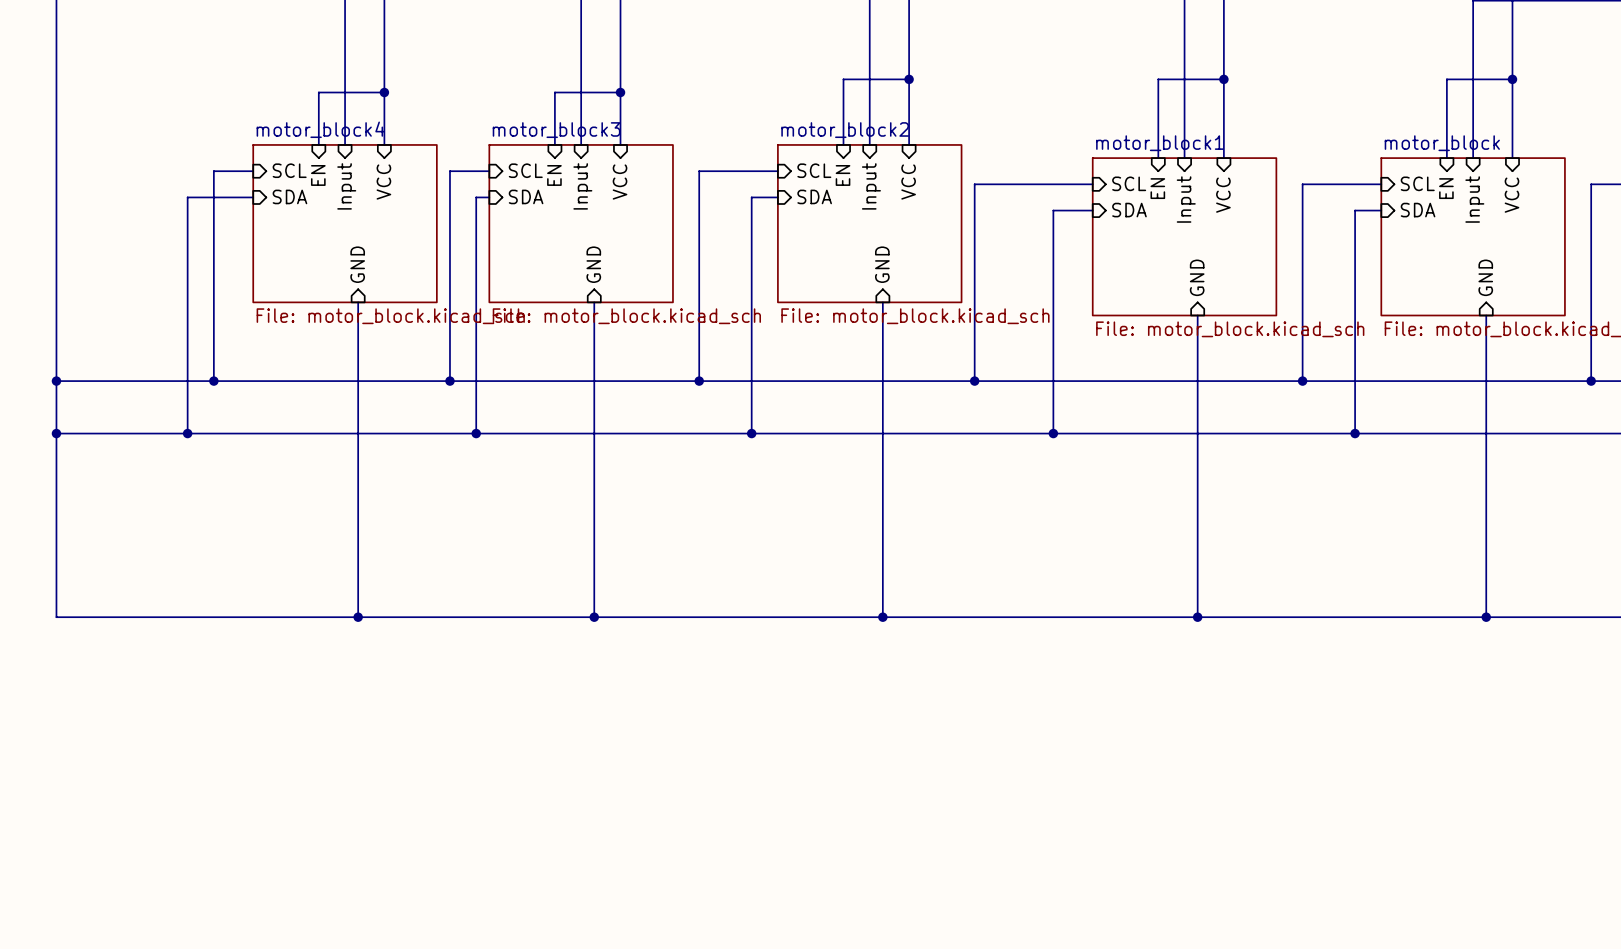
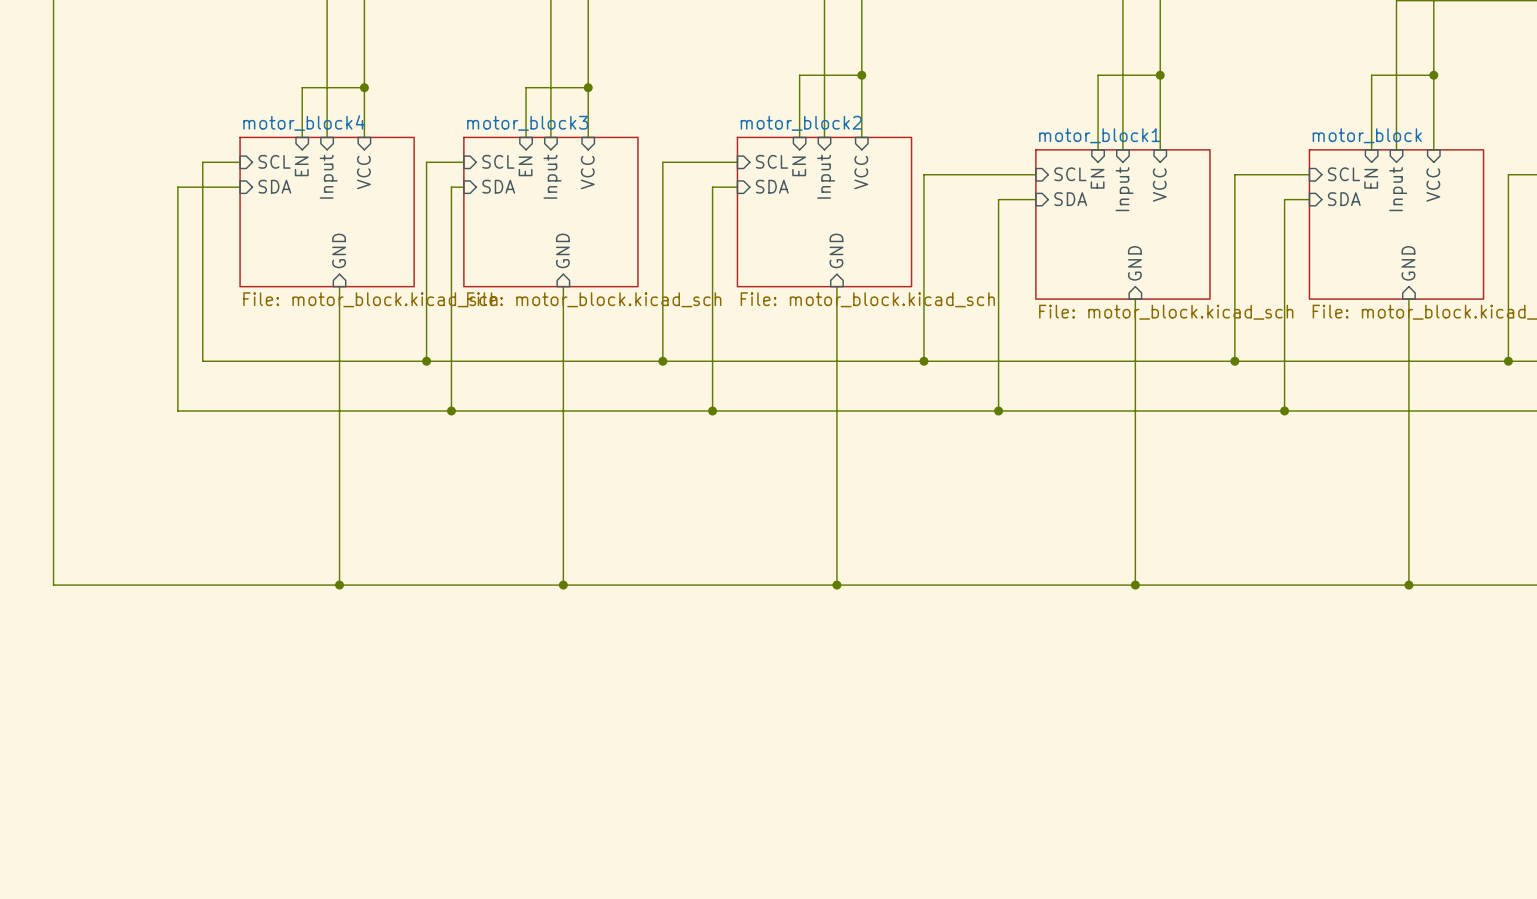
wire: (56, 381) (213, 381) -> none
junction: (56, 381) -> none
junction: (213, 381) -> none
wire: (56, 433) (187, 433) -> none
junction: (56, 433) -> none
junction: (187, 433) -> none

